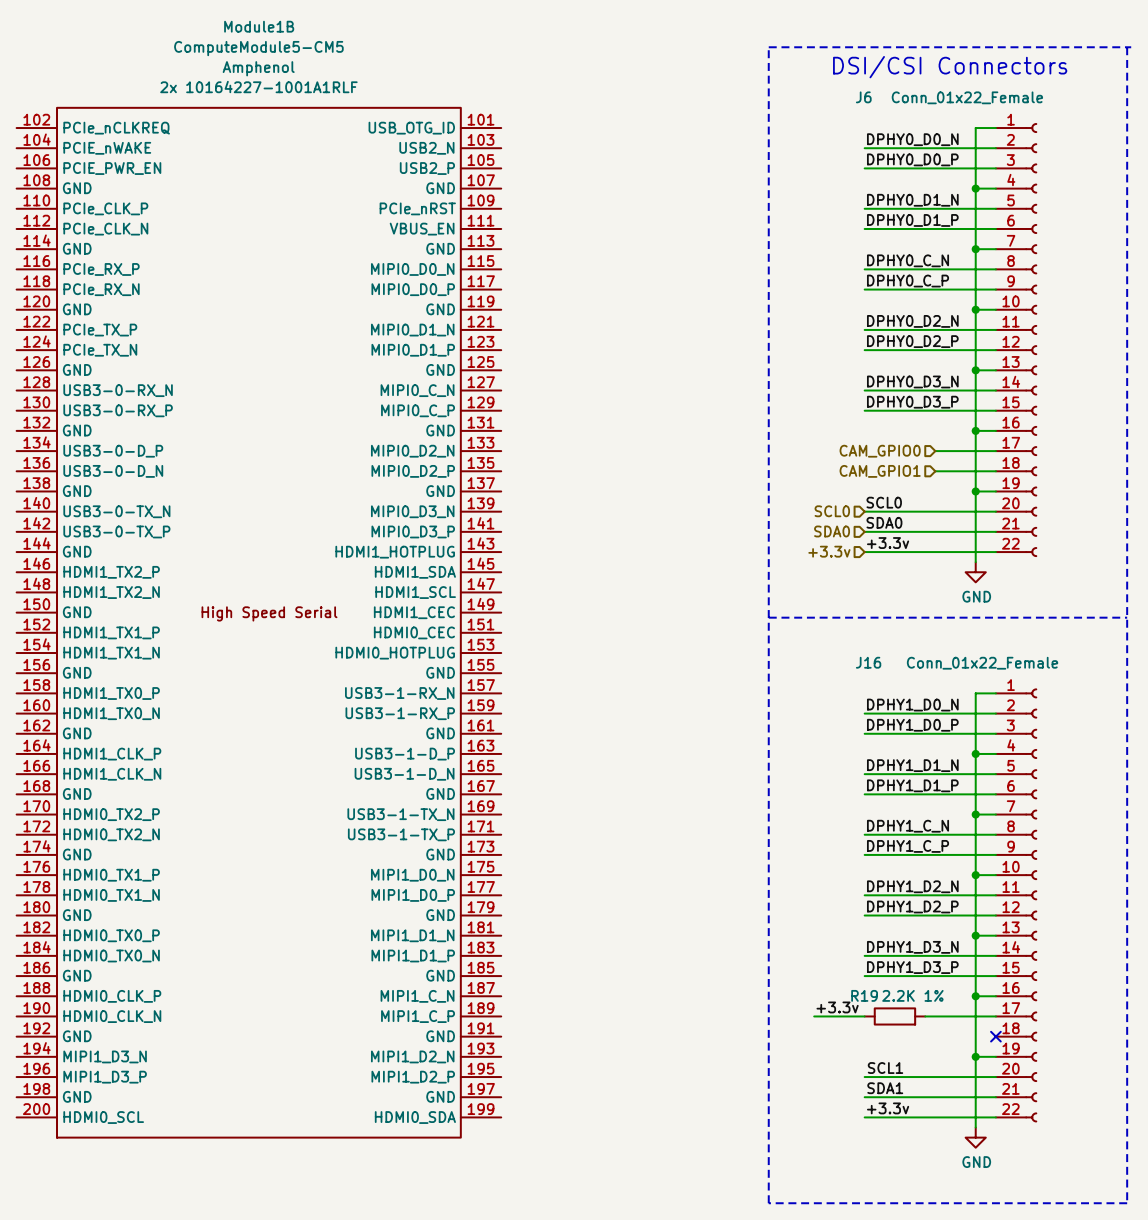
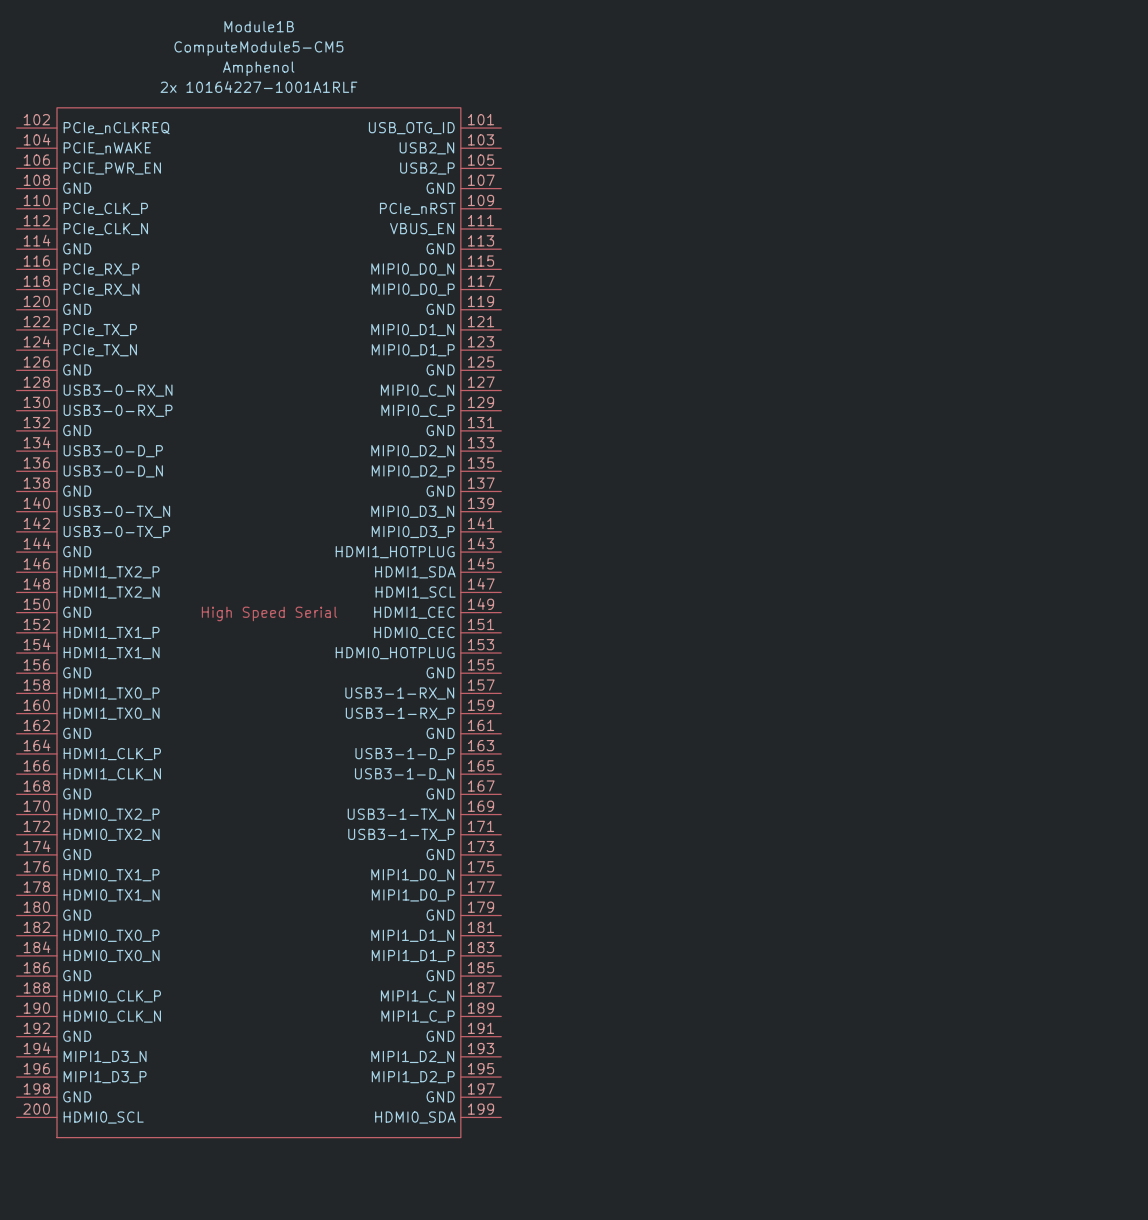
line: (1127, 47) (1127, 1203) (768, 1203) (768, 47) (1131, 47) -> none
text: DSI/CSI Connectors (950, 67) -> none
wire: (995, 128) (975, 128) (975, 562) -> none
label: DPHY0_D0_N (912, 139) -> none
wire: (864, 148) (995, 148) -> none
label: DPHY0_D0_P (912, 159) -> none
wire: (864, 168) (995, 168) -> none
wire: (975, 188) (995, 188) -> none
junction: (975, 188) -> none
label: DPHY0_D1_N (912, 200) -> none
wire: (864, 208) (995, 208) -> none
label: DPHY0_D1_P (912, 220) -> none
wire: (864, 228) (995, 228) -> none
wire: (975, 249) (995, 249) -> none
junction: (975, 249) -> none
label: DPHY0_C_N (908, 260) -> none
wire: (864, 269) (995, 269) -> none
label: DPHY0_C_P (908, 281) -> none
wire: (864, 289) (995, 289) -> none
wire: (975, 309) (995, 309) -> none
junction: (975, 309) -> none
label: DPHY0_D2_N (912, 321) -> none
wire: (864, 329) (995, 329) -> none
J6: Conn_01x22_Female (1016, 340) -> none
label: DPHY0_D2_P (912, 341) -> none
wire: (864, 350) (995, 350) -> none
wire: (975, 370) (995, 370) -> none
junction: (975, 370) -> none
label: DPHY0_D3_N (912, 381) -> none
wire: (864, 390) (995, 390) -> none
label: DPHY0_D3_P (912, 402) -> none
wire: (864, 410) (995, 410) -> none
wire: (975, 430) (995, 430) -> none
junction: (975, 430) -> none
hierarchical label: CAM_GPIO0 (880, 451) -> none
wire: (935, 451) (995, 451) -> none
hierarchical label: CAM_GPIO1 (880, 471) -> none
wire: (935, 471) (995, 471) -> none
wire: (975, 491) (995, 491) -> none
junction: (975, 491) -> none
label: SCL0 (884, 502) -> none
hierarchical label: SCL0 (832, 511) -> none
wire: (864, 511) (995, 511) -> none
label: SDA0 (884, 522) -> none
hierarchical label: SDA0 (832, 531) -> none
wire: (864, 531) (995, 531) -> none
label: +3.3v (888, 543) -> none
hierarchical label: +3.3v (829, 551) -> none
wire: (864, 552) (995, 552) -> none
power symbol: GND (975, 572) -> none
line: (768, 617) (1127, 617) -> none
wire: (995, 693) (975, 693) (975, 1127) -> none
label: DPHY1_D0_N (912, 705) -> none
wire: (864, 713) (995, 713) -> none
label: DPHY1_D0_P (912, 725) -> none
wire: (864, 733) (995, 733) -> none
wire: (975, 753) (995, 753) -> none
junction: (975, 753) -> none
label: DPHY1_D1_N (912, 765) -> none
wire: (864, 774) (995, 774) -> none
label: DPHY1_D1_P (912, 785) -> none
wire: (864, 794) (995, 794) -> none
wire: (975, 814) (995, 814) -> none
junction: (975, 814) -> none
label: DPHY1_C_N (908, 826) -> none
wire: (864, 834) (995, 834) -> none
label: DPHY1_C_P (908, 846) -> none
wire: (864, 854) (995, 854) -> none
wire: (975, 875) (995, 875) -> none
junction: (975, 875) -> none
label: DPHY1_D2_N (912, 886) -> none
wire: (864, 895) (995, 895) -> none
J16: Conn_01x22_Female (1016, 905) -> none
label: DPHY1_D2_P (912, 906) -> none
wire: (864, 915) (995, 915) -> none
wire: (975, 935) (995, 935) -> none
junction: (975, 935) -> none
label: DPHY1_D3_N (912, 947) -> none
wire: (864, 955) (995, 955) -> none
label: DPHY1_D3_P (912, 967) -> none
wire: (864, 976) (995, 976) -> none
wire: (975, 996) (995, 996) -> none
junction: (975, 996) -> none
label: +3.3v (837, 1007) -> none
wire: (814, 1016) (864, 1016) -> none
R19: 2.2K 1% (894, 1016) -> none
wire: (925, 1016) (995, 1016) -> none
no-connect mark: (995, 1036) -> none
wire: (975, 1056) (995, 1056) -> none
junction: (975, 1056) -> none
label: SCL1 (885, 1068) -> none
wire: (864, 1077) (995, 1077) -> none
label: SDA1 (885, 1088) -> none
wire: (864, 1097) (995, 1097) -> none
label: +3.3v (888, 1108) -> none
wire: (864, 1117) (995, 1117) -> none
power symbol: GND (975, 1137) -> none

